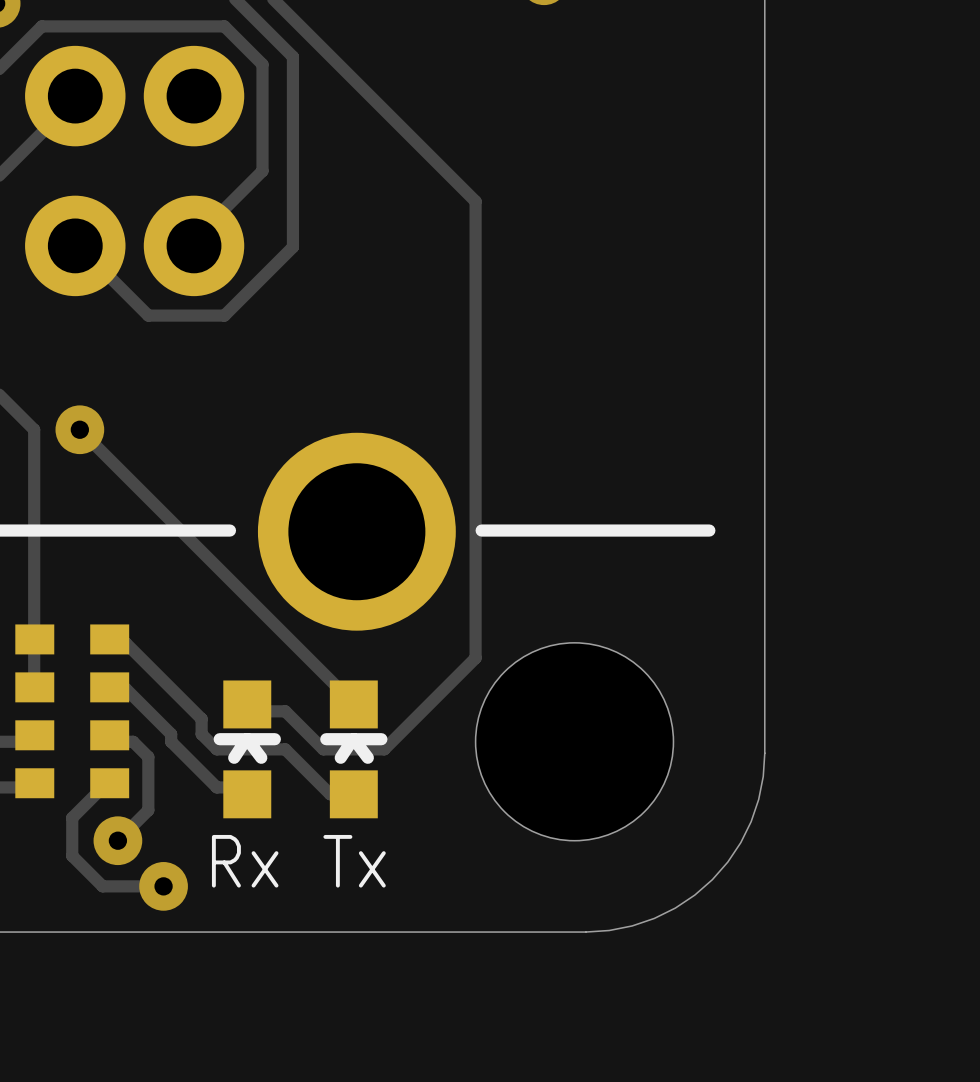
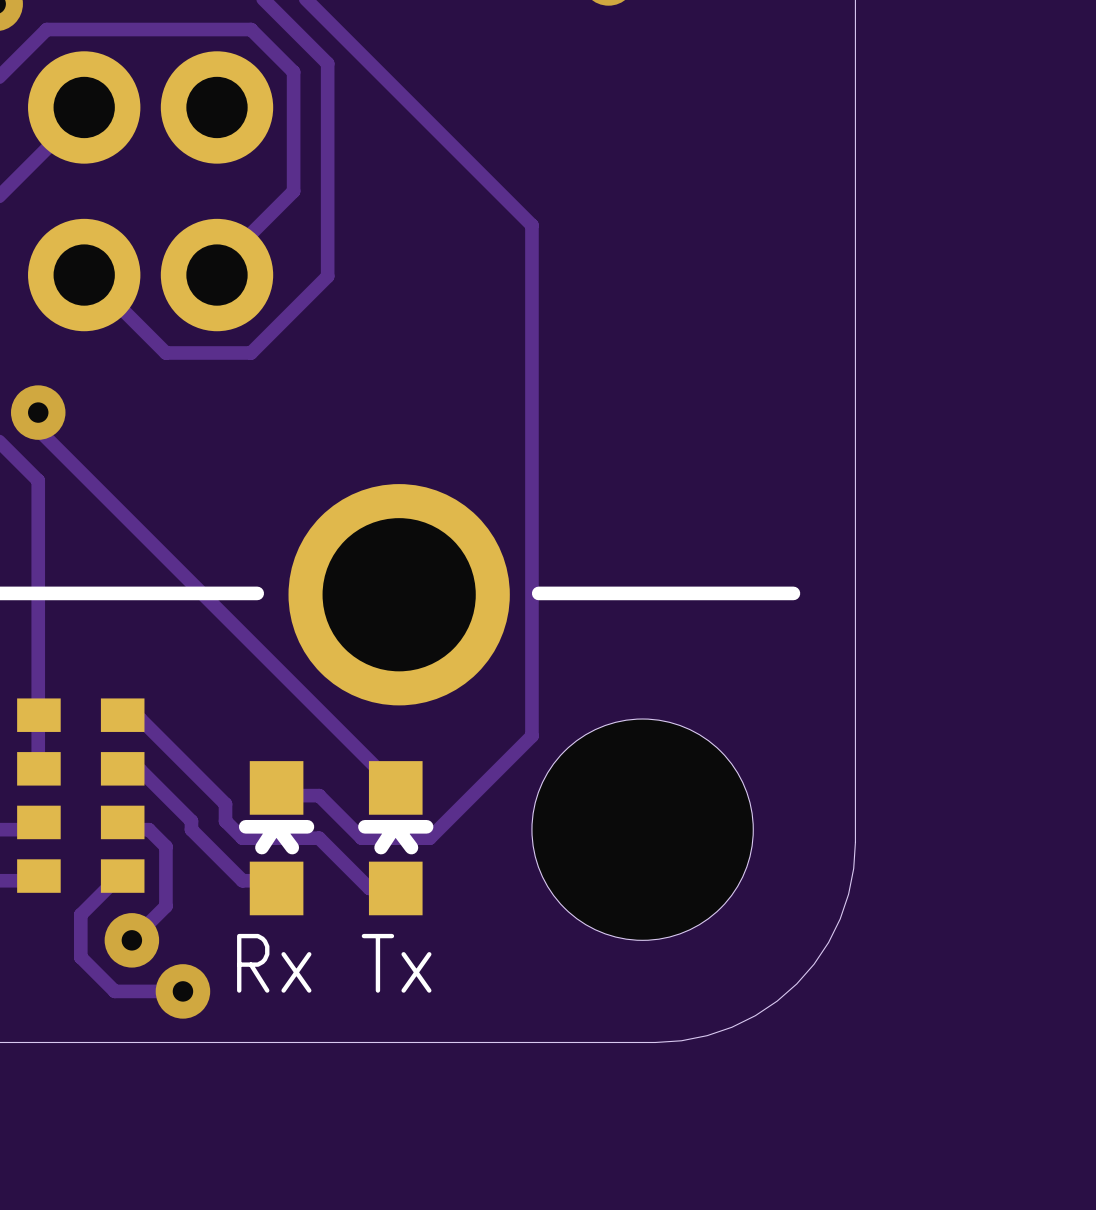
track: none -> (38, 412) (38, 429) (89, 480)
via: none -> (38, 412)
via: (79, 429) -> none

